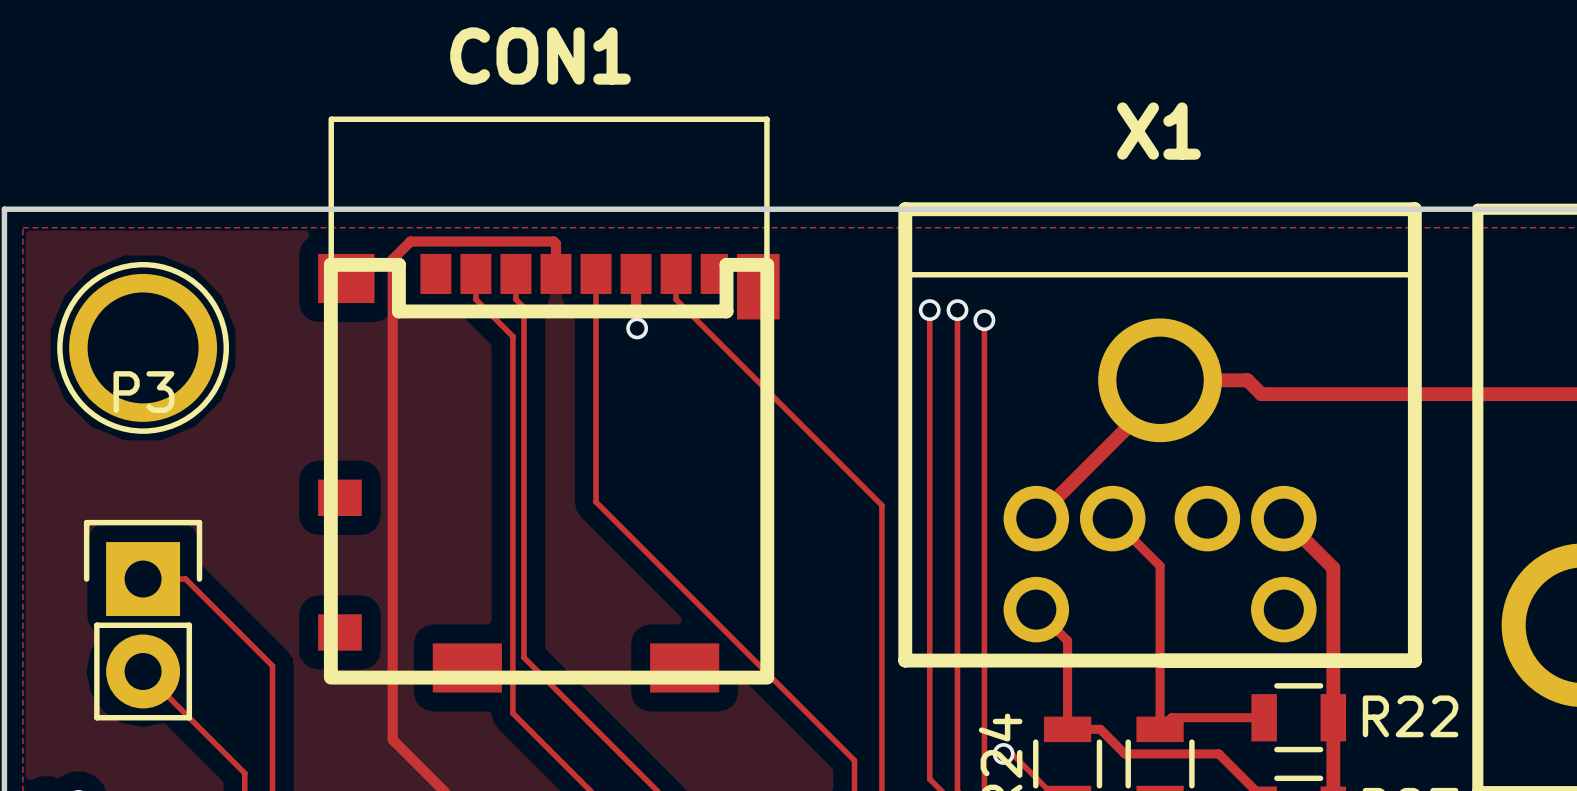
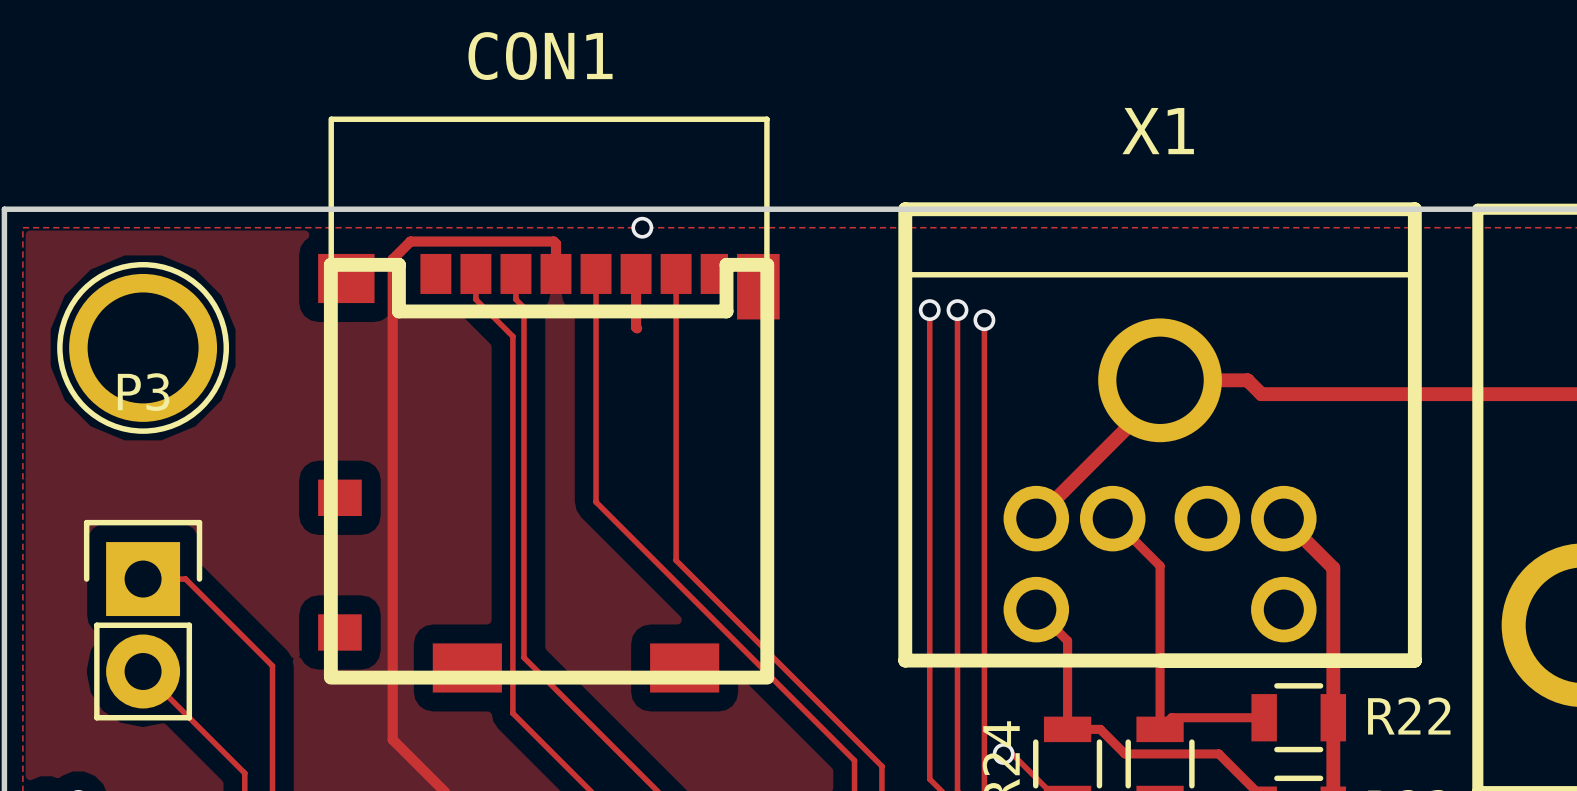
track: (676, 299) (881, 505) (881, 766) -> (676, 299) (676, 560) (881, 766)
via position: (637, 328) -> (642, 227)

